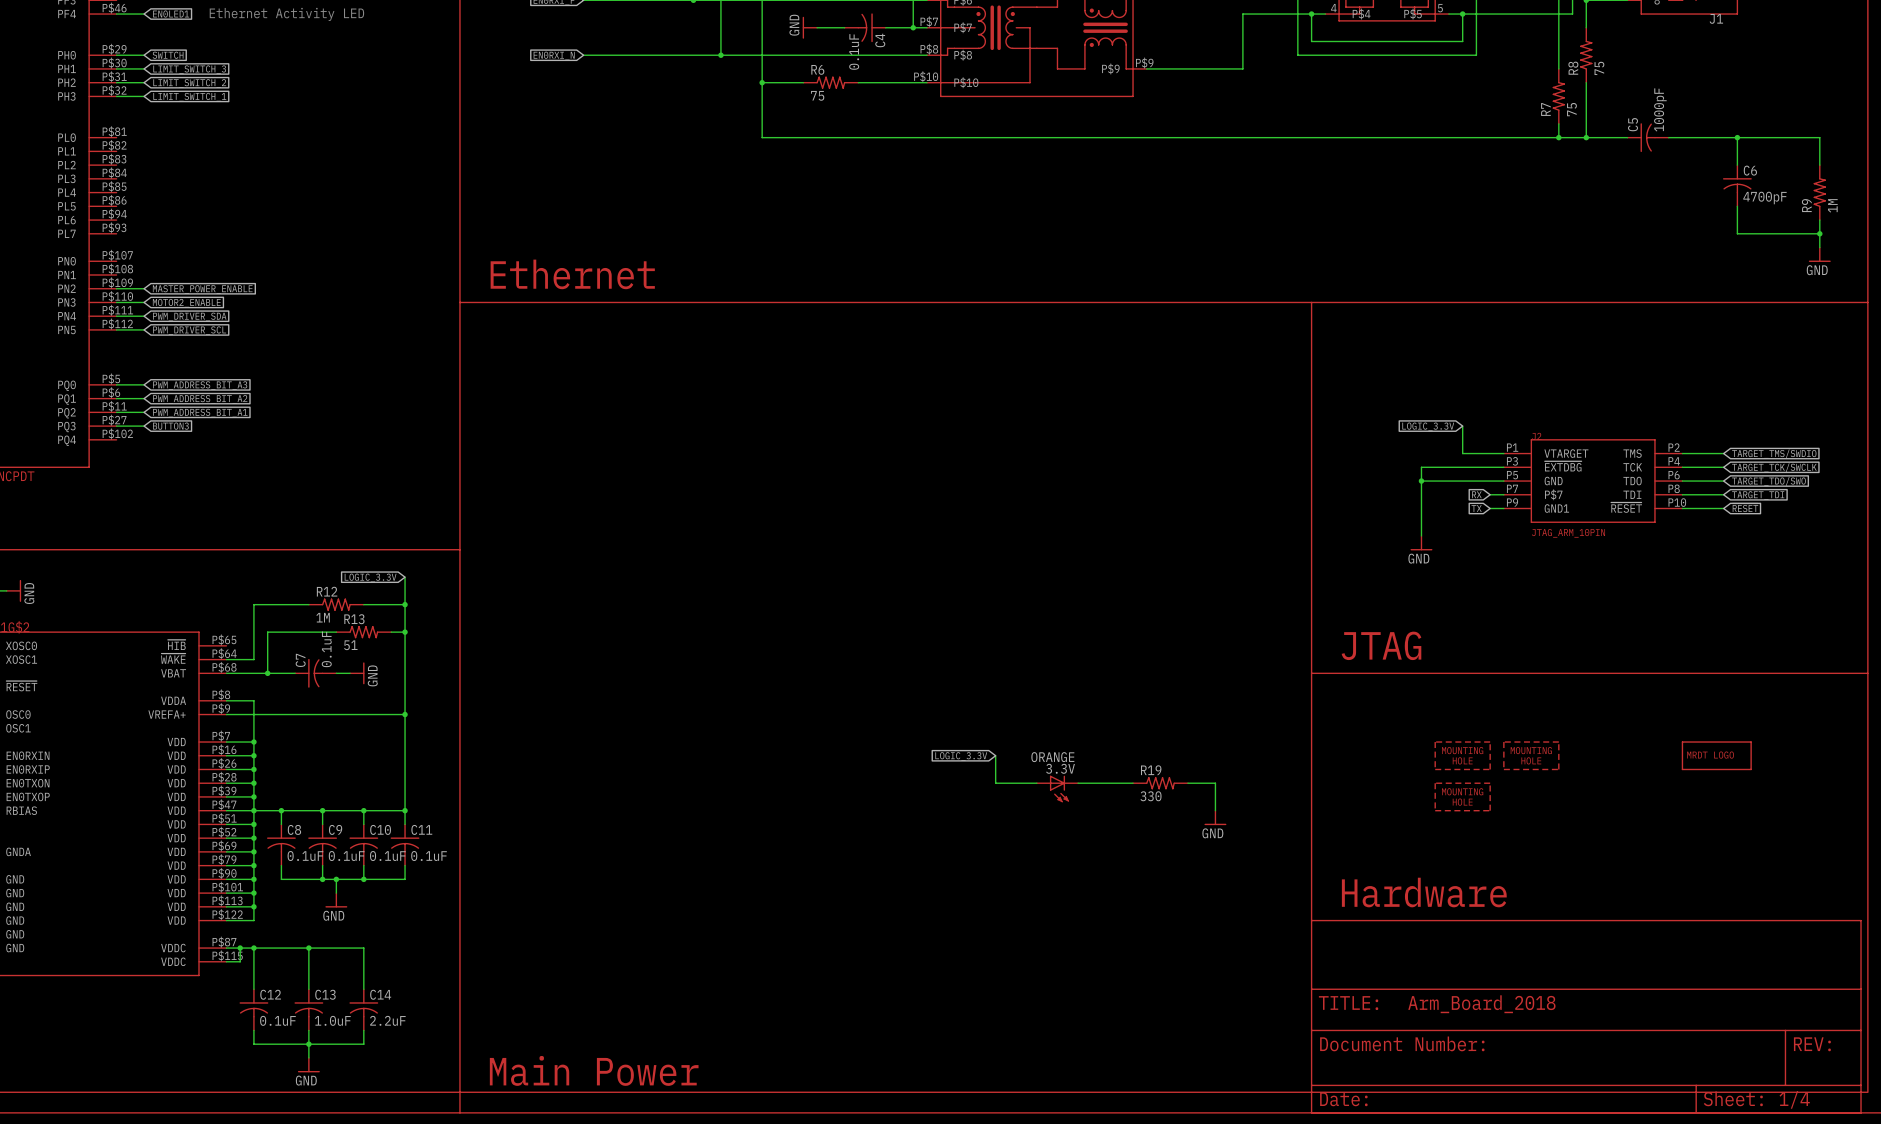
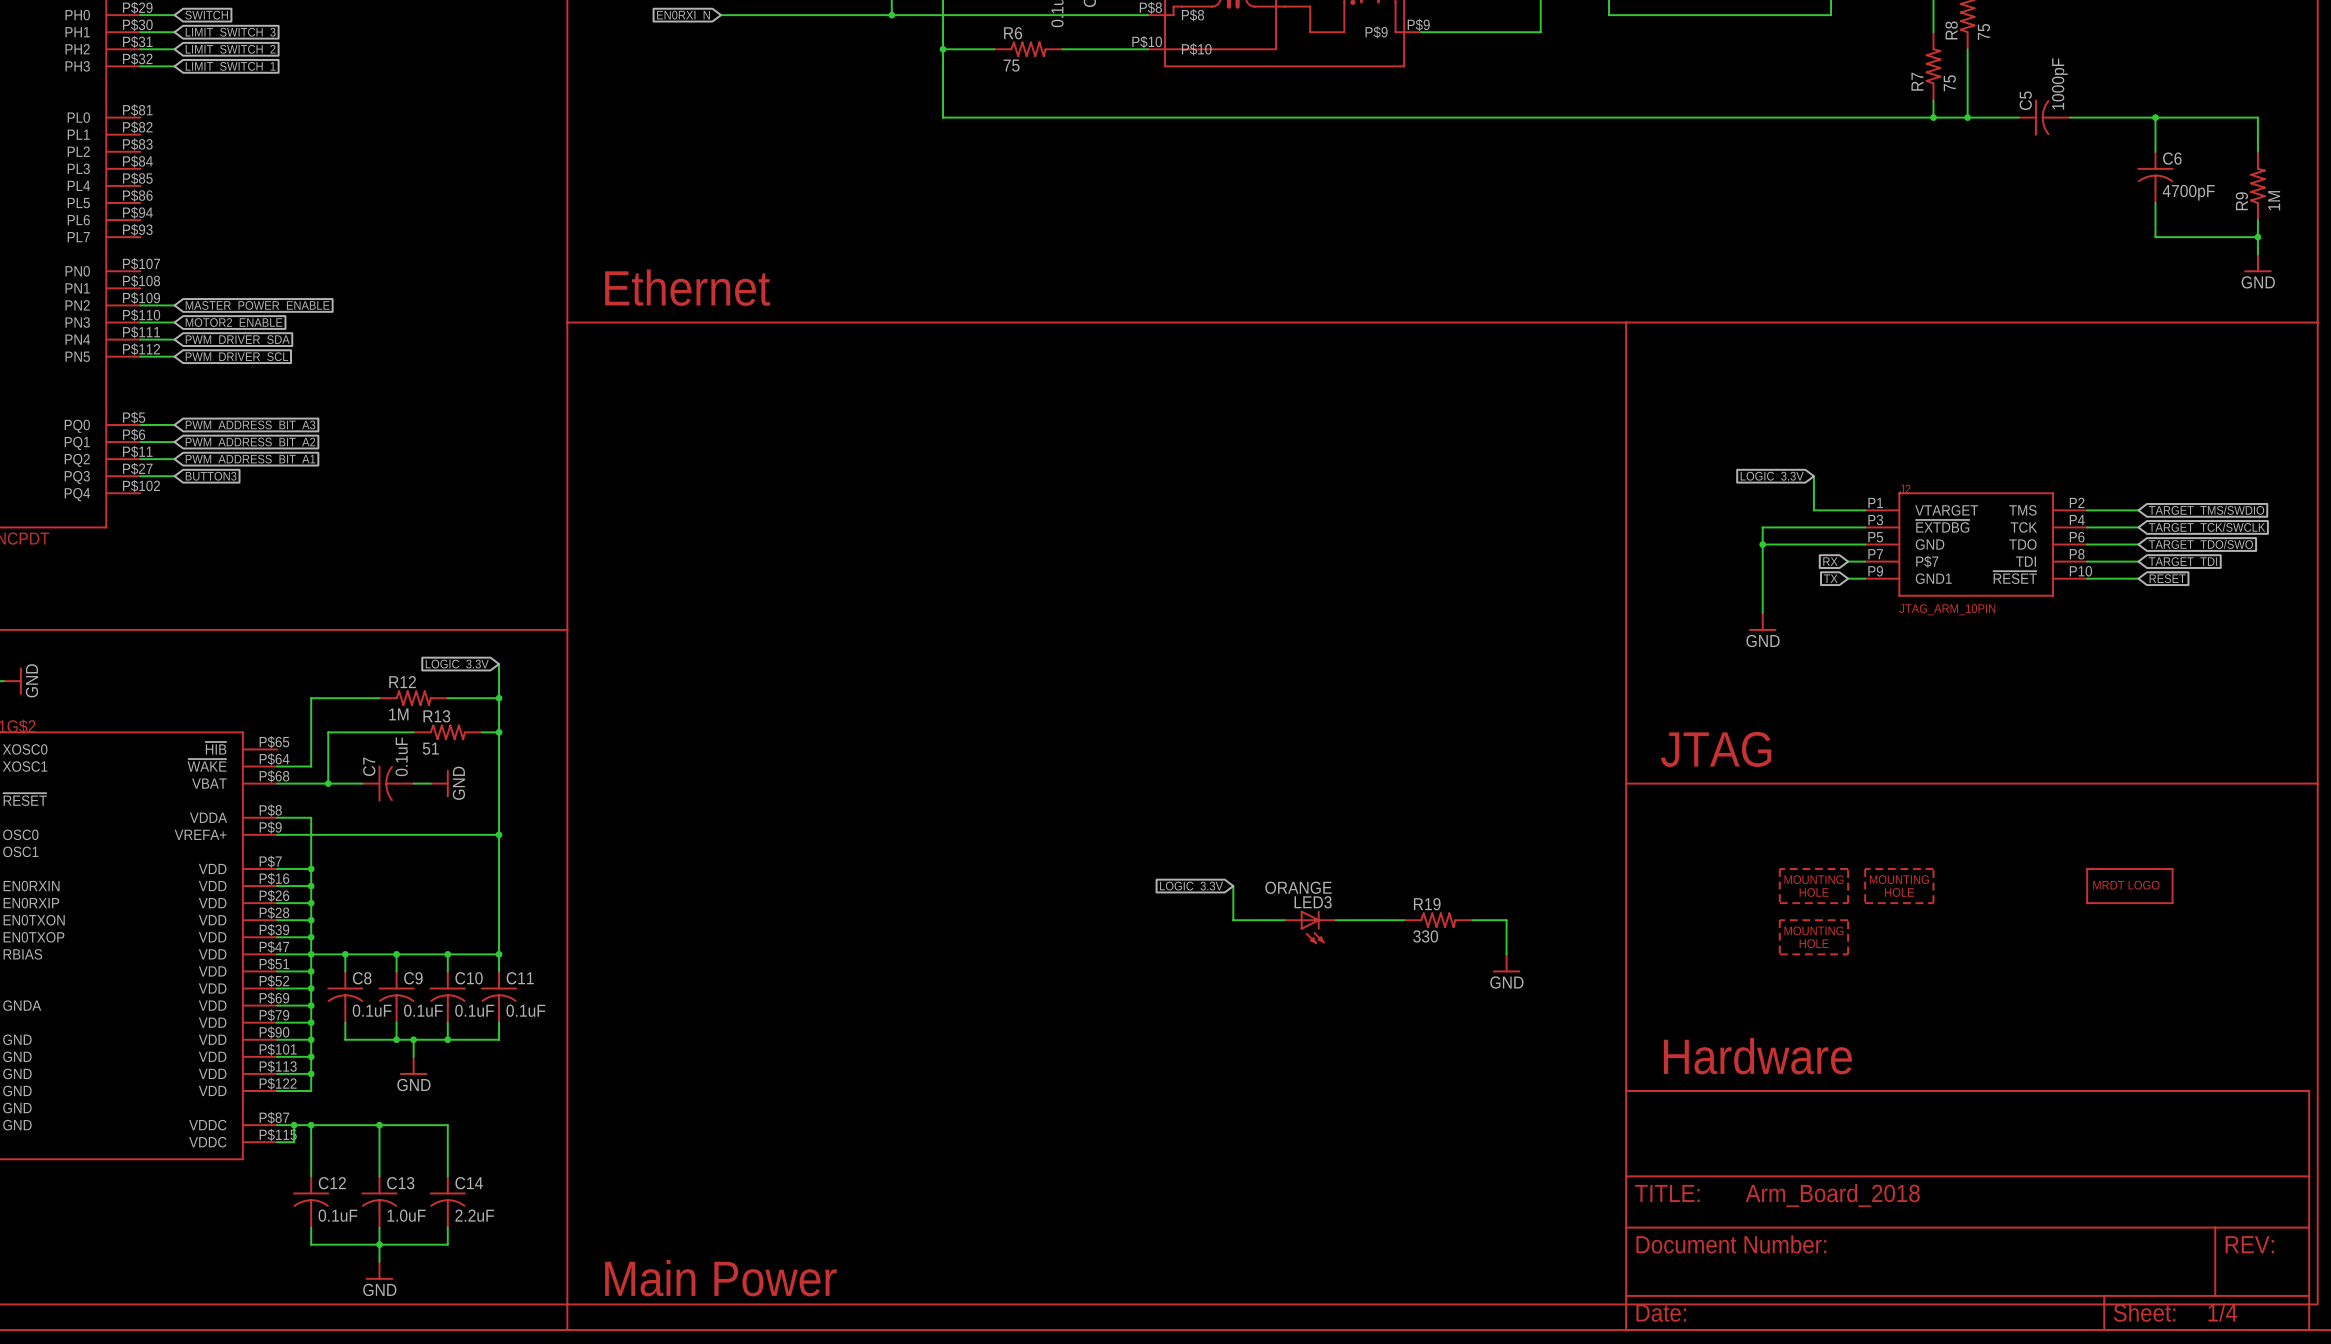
3.3V name: 3.3V (1060, 768) -> LED3 (1313, 902)

